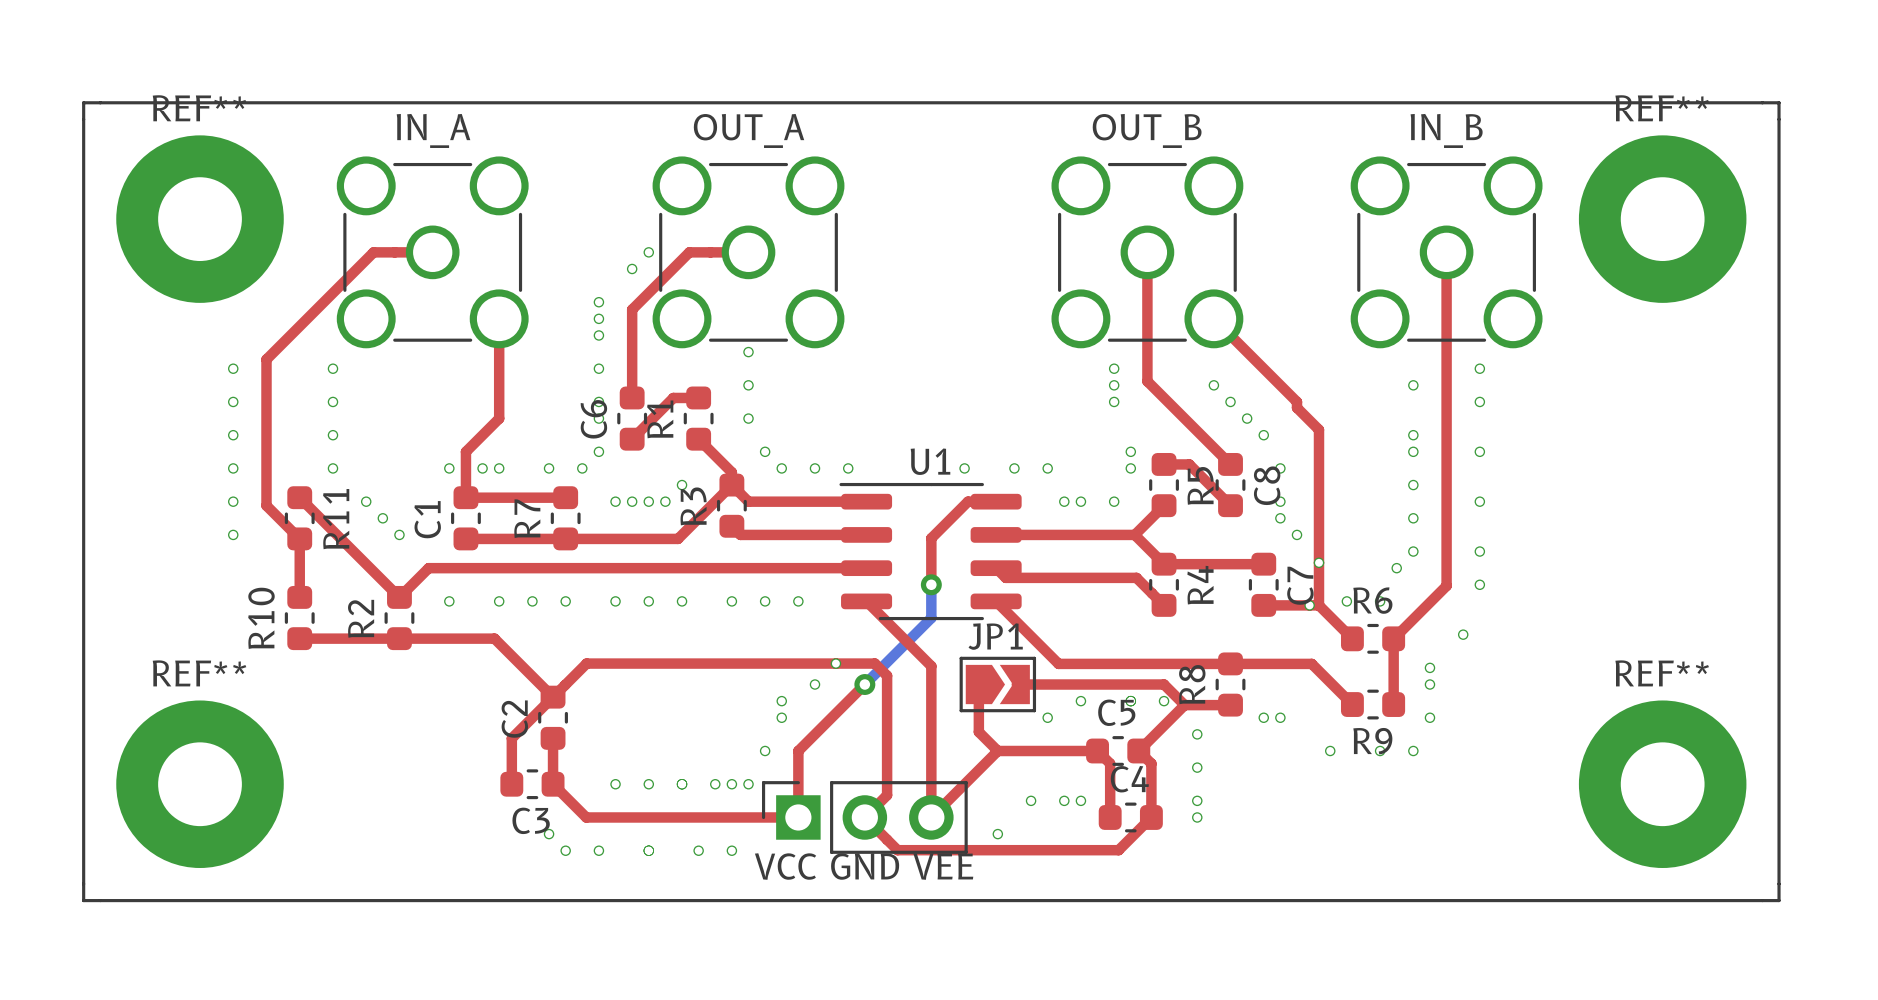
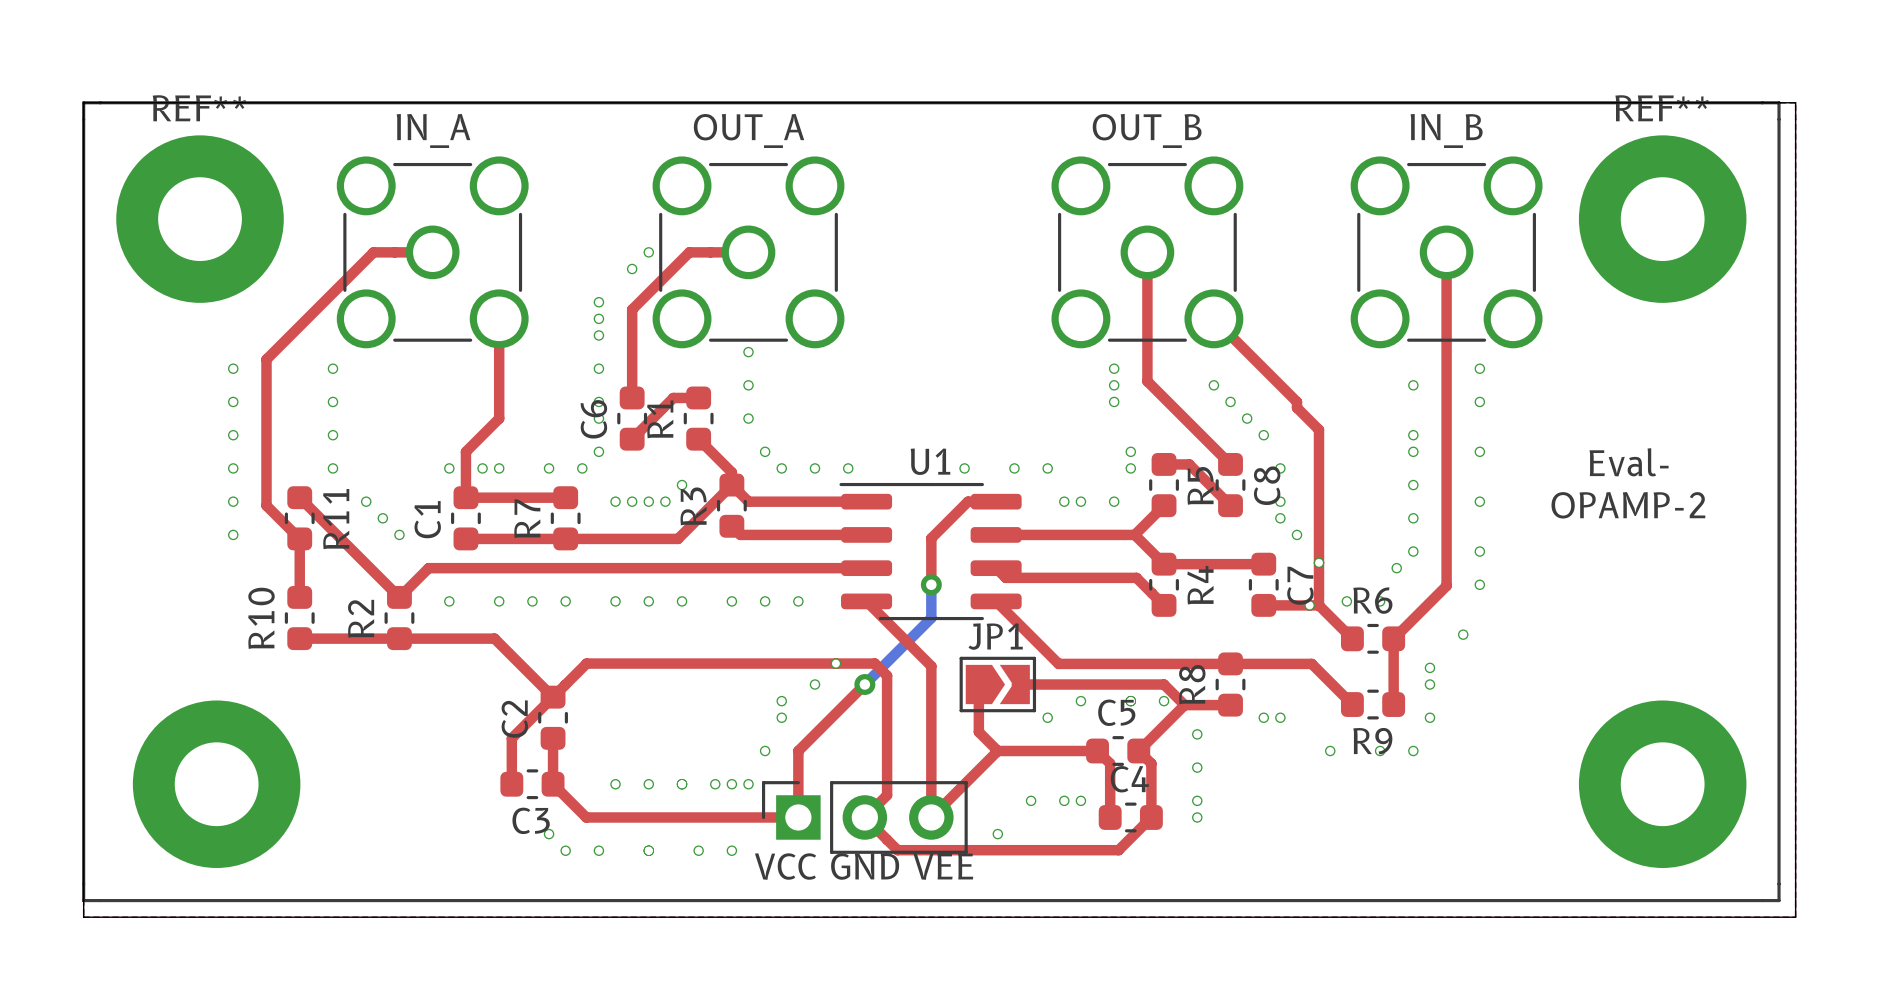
board edge: none -> (83, 102) (83, 917) (1795, 917) (1795, 102) (83, 102)
text: none -> Eval- (1629, 462)
text: none -> OPAMP-2 (1628, 505)
REF** name: REF** (199, 673) -> none
REF** name: REF** (1662, 673) -> none
REF** position: (200, 784) -> (216, 784)

